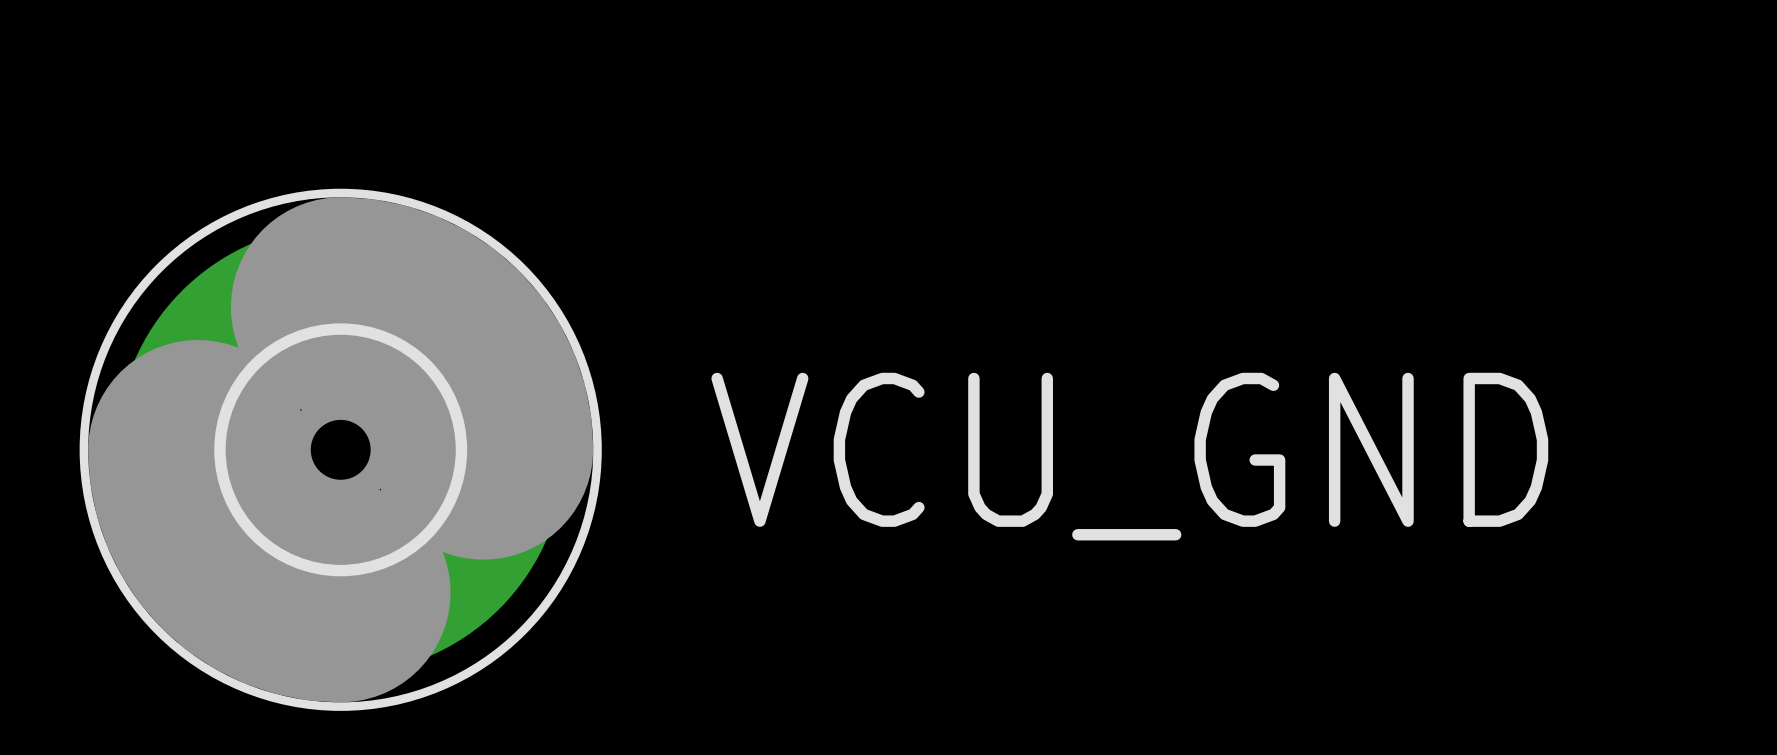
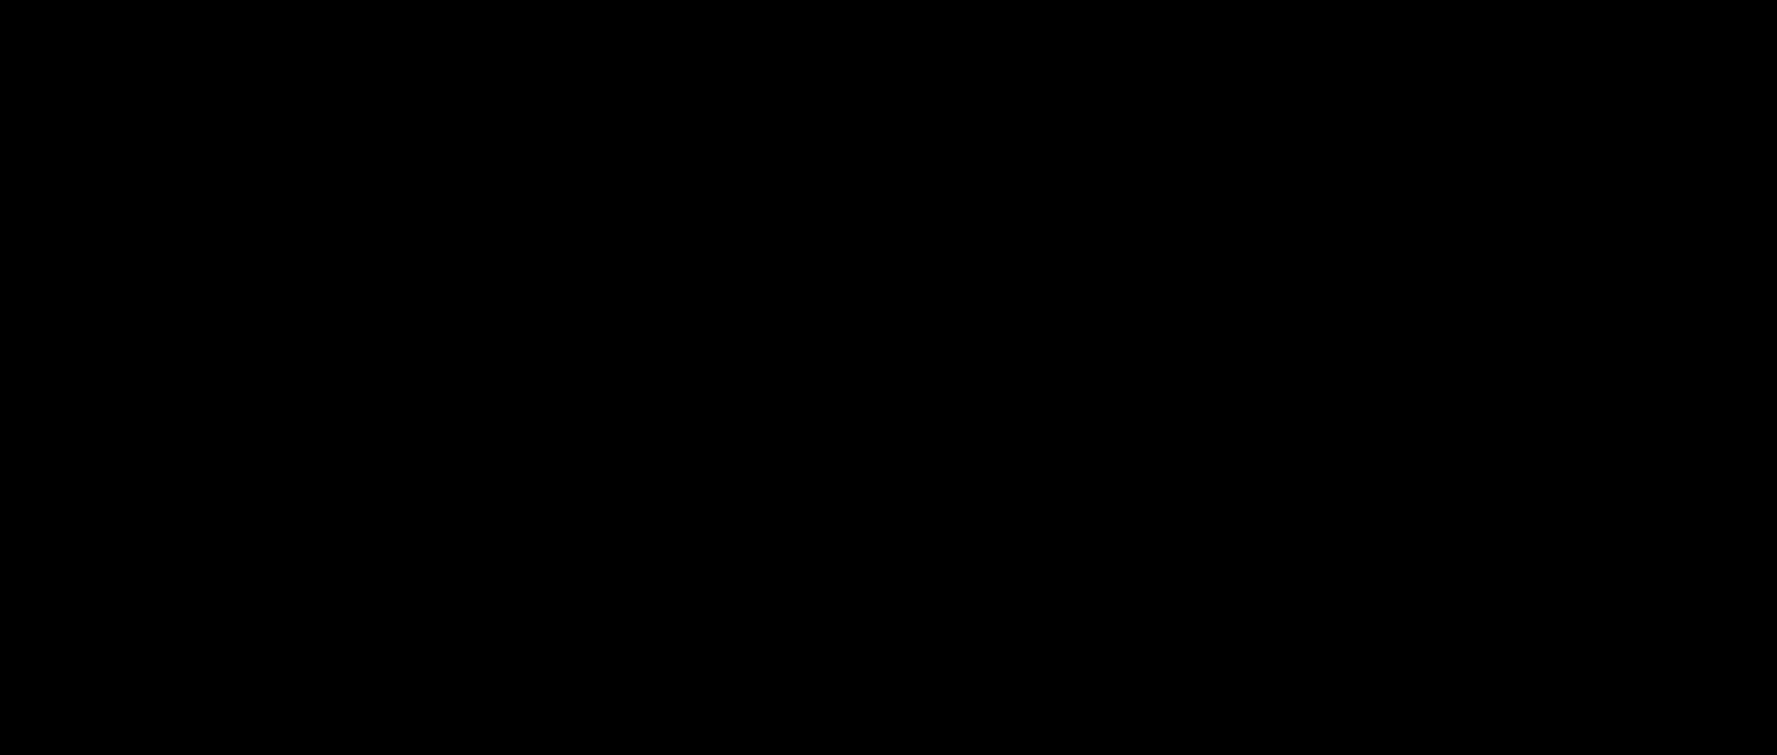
VCU_GND: (340, 449) -> none

